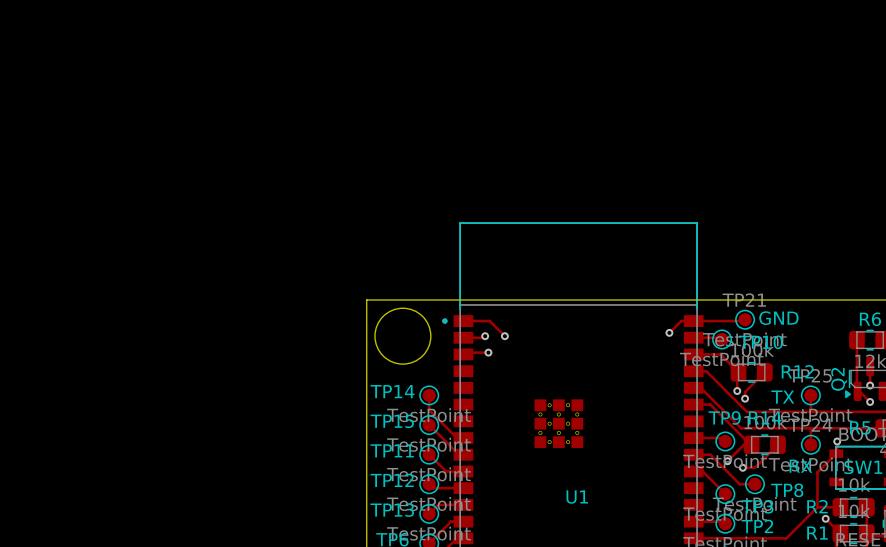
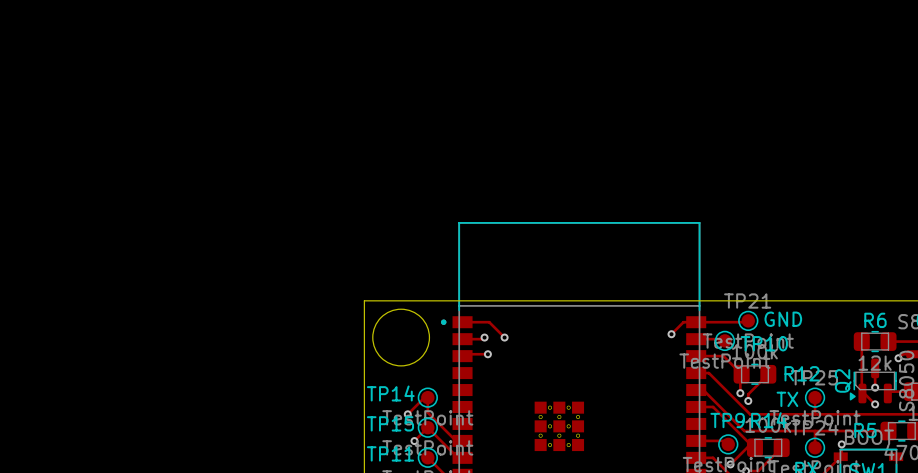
track: none -> (427, 397) (424, 397) (407, 414)
via: none -> (407, 414)
track: none -> (427, 427) (414, 441)
via: none -> (414, 441)

